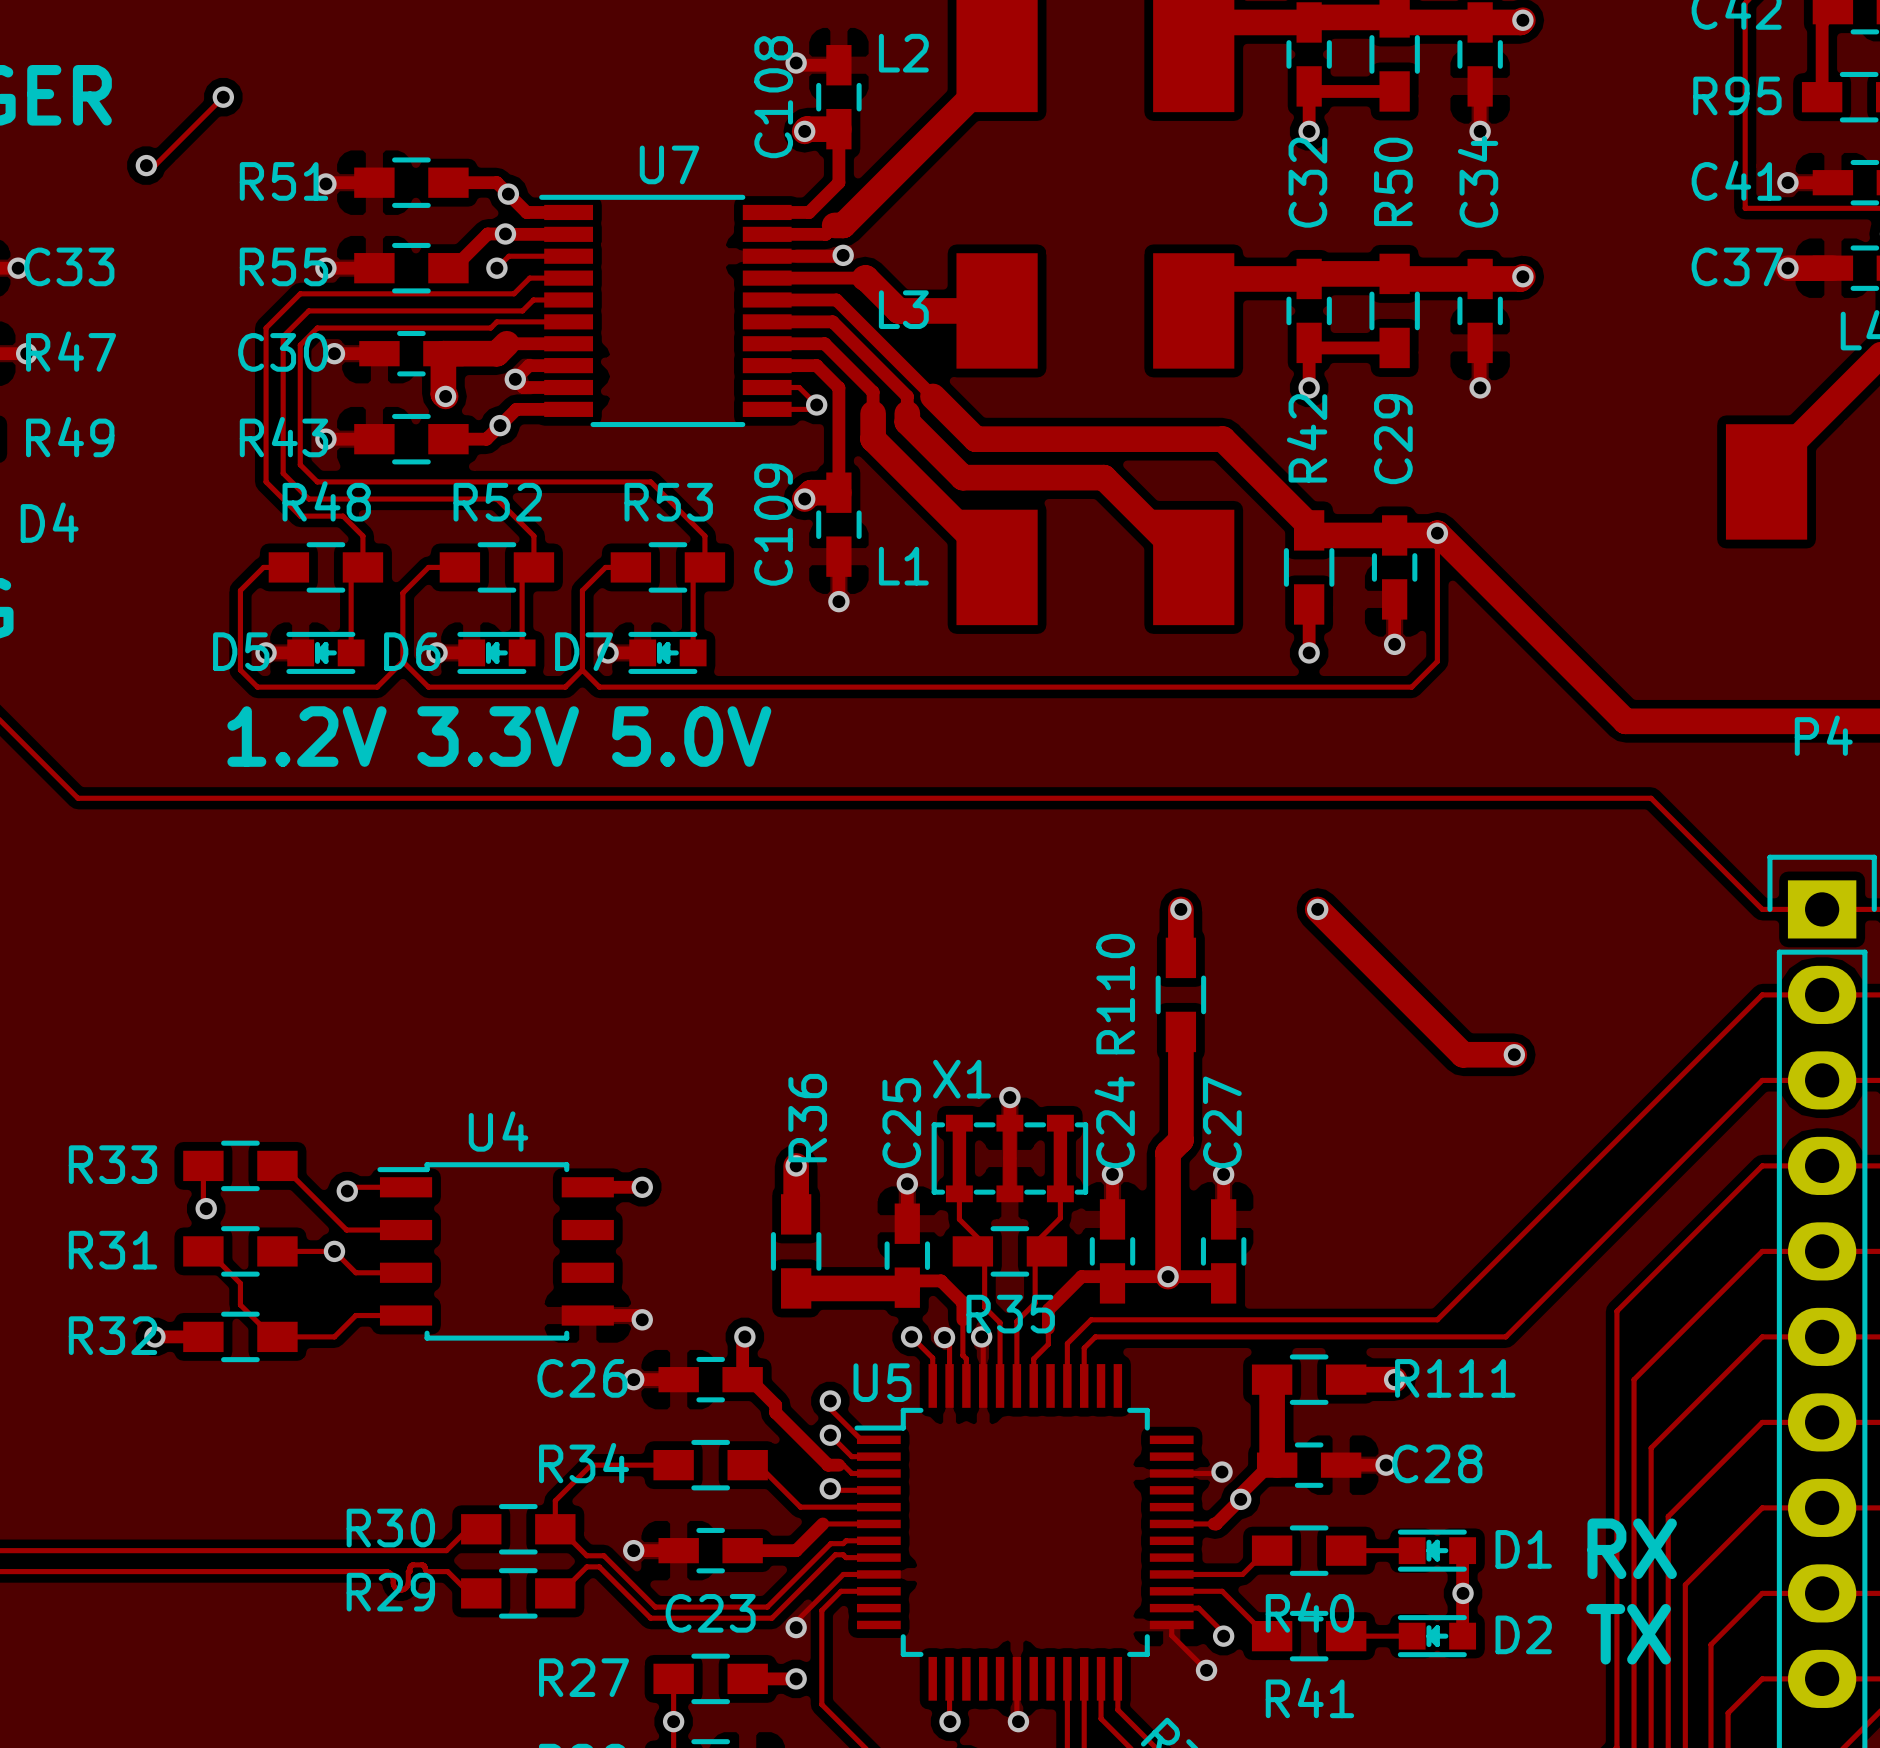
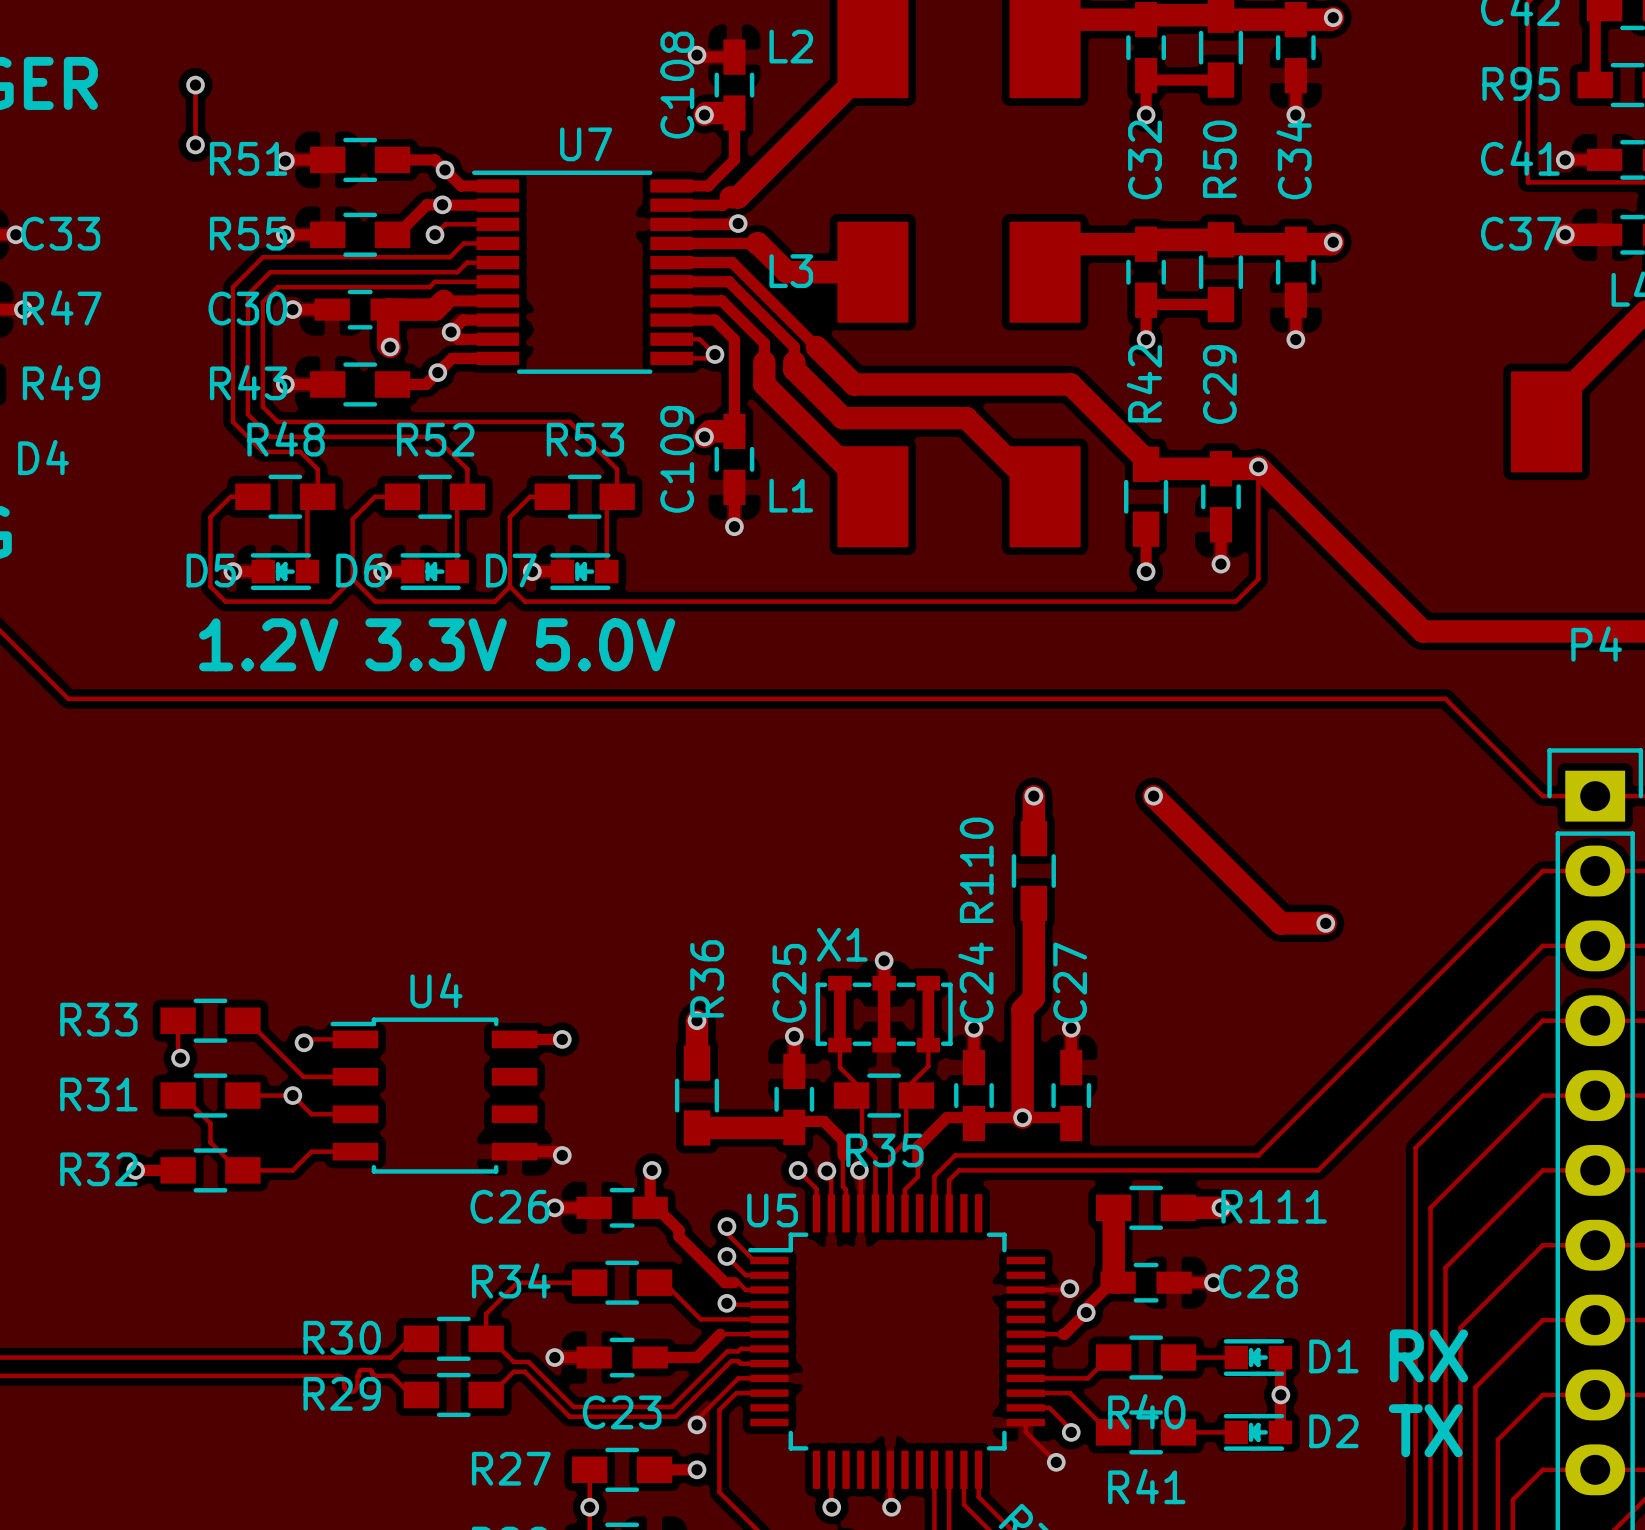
track: (223, 97) (154, 165) (146, 165) -> (195, 85) (195, 144)
via position: (146, 165) -> (195, 144)

